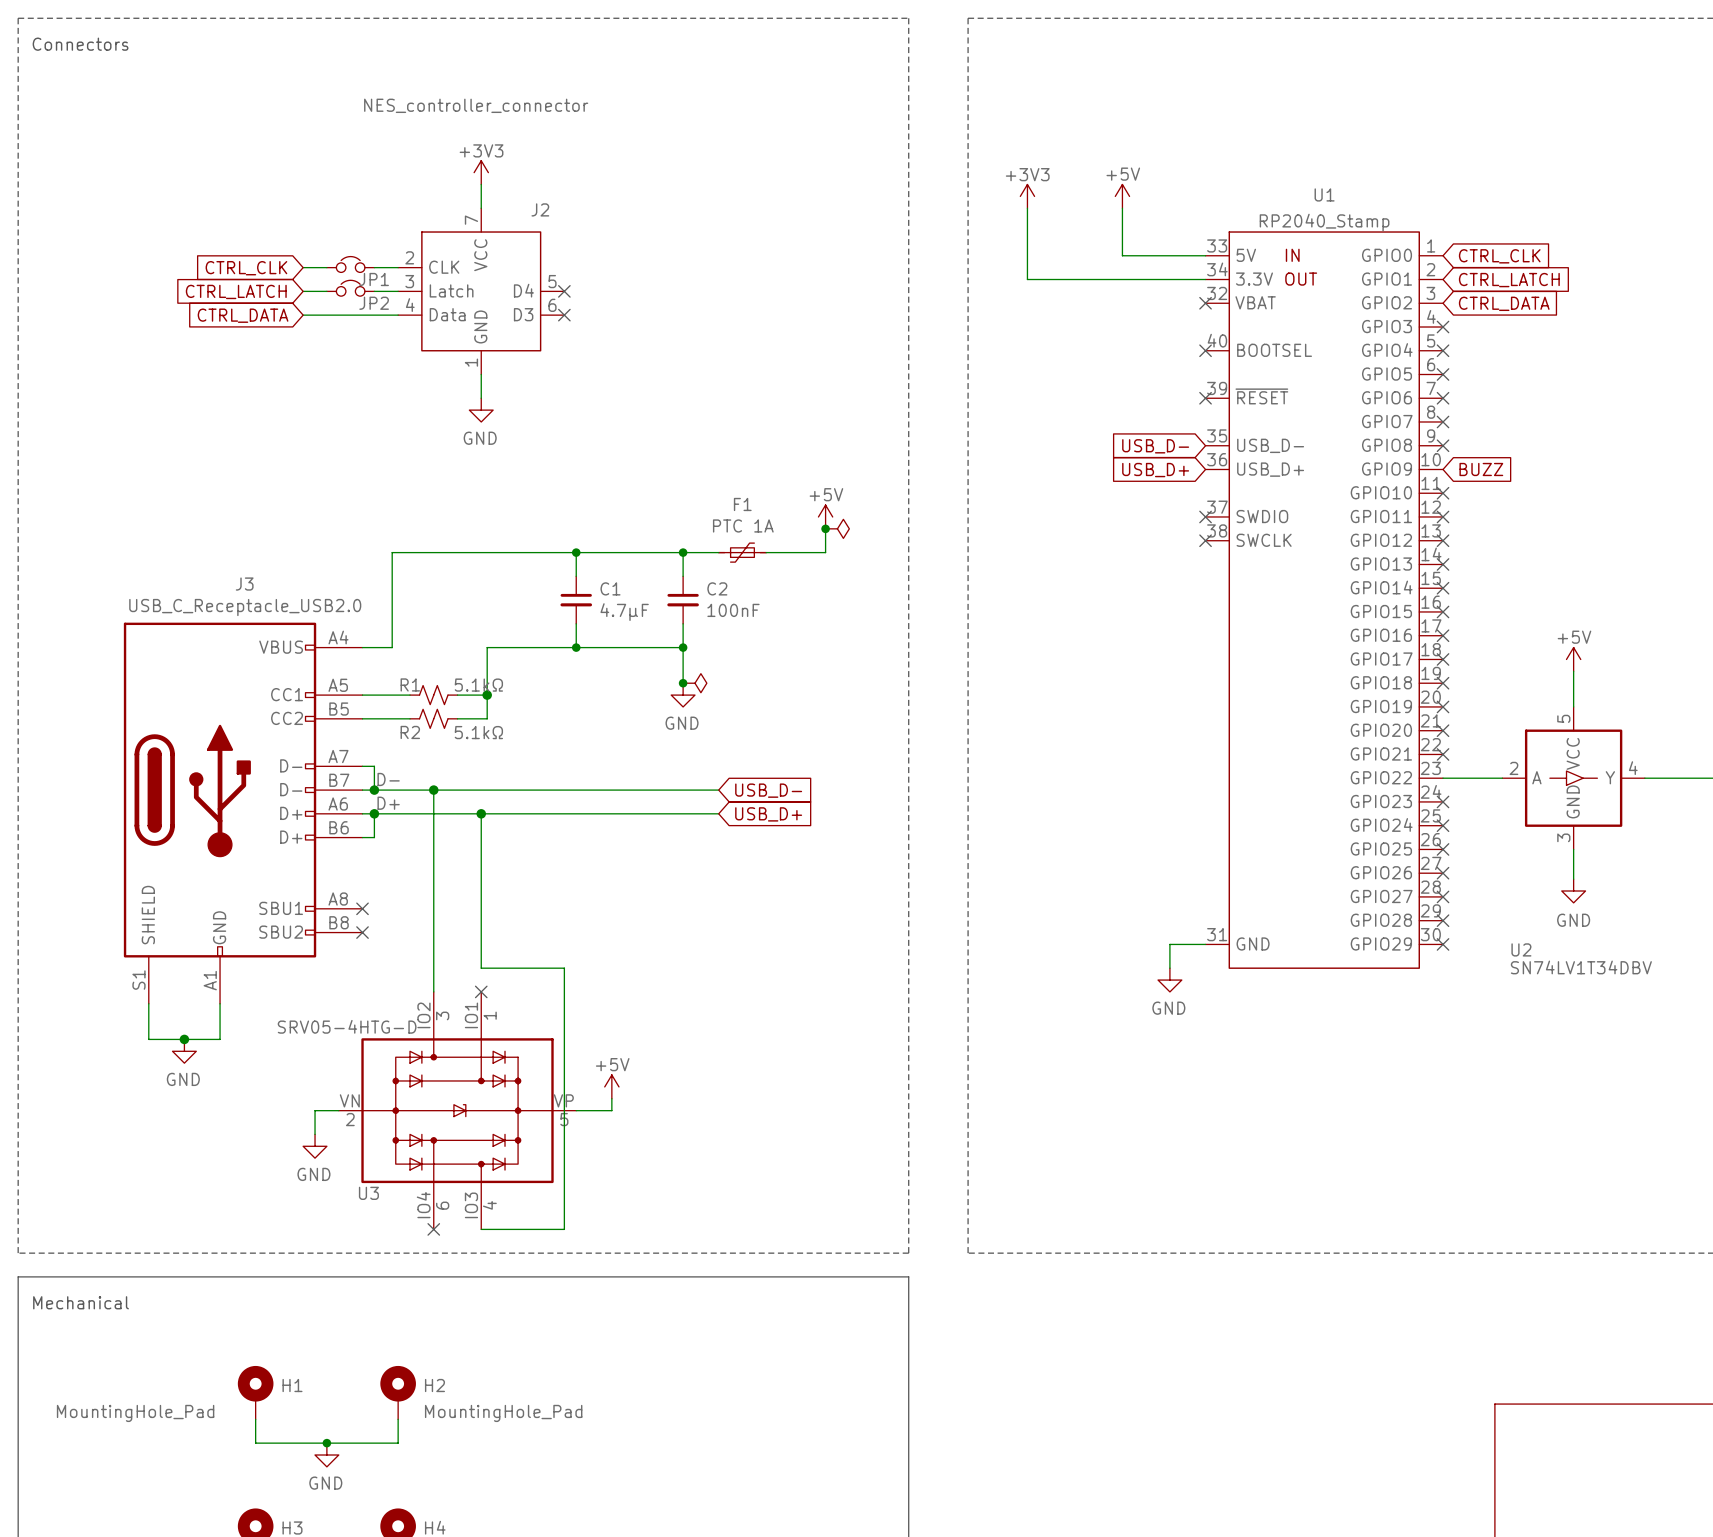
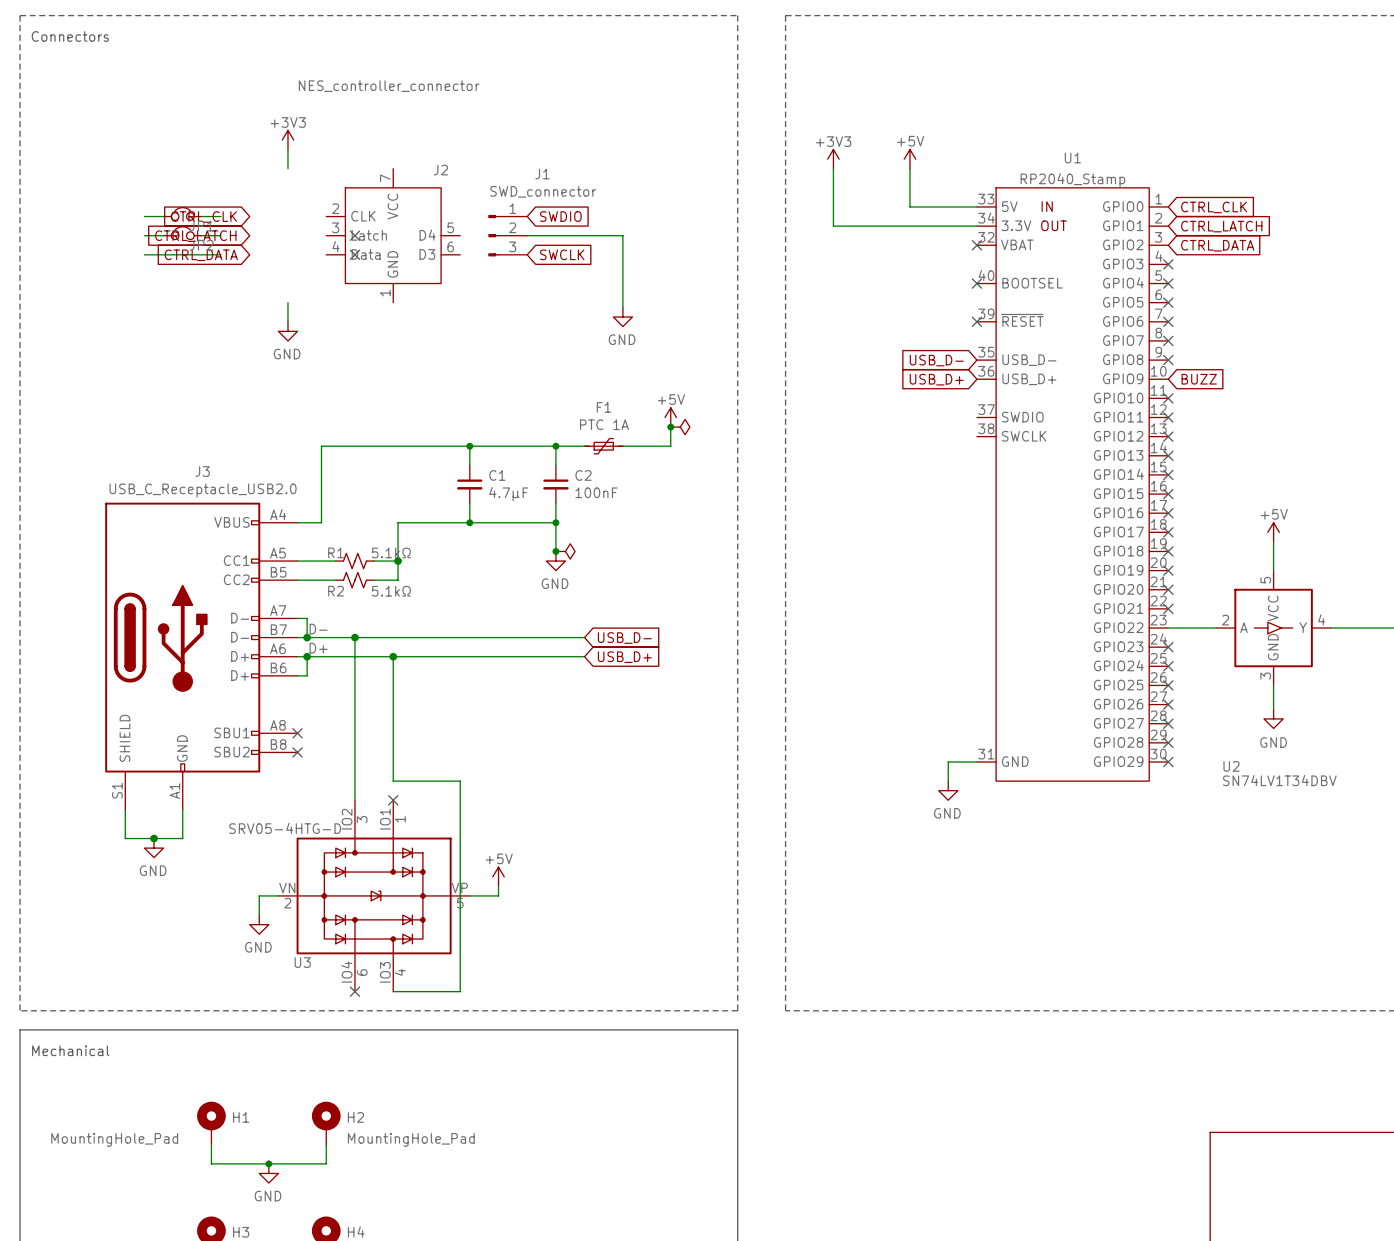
power symbol position: +3V3 (481, 172) -> +3V3 (287, 139)
wire: (481, 184) (481, 208) -> (287, 149) (287, 168)
JP1 position: (350, 264) -> (182, 214)
wire: (303, 267) (326, 267) -> (144, 216) (163, 216)
wire: (374, 267) (398, 267) -> (201, 216) (221, 216)
global label: none -> SWDIO (560, 216)
JP2 position: (350, 288) -> (182, 233)
wire: (303, 291) (326, 291) -> (144, 235) (163, 235)
wire: (374, 291) (398, 291) -> (201, 235) (221, 235)
no-connect mark: none -> (354, 235)
no-connect mark: (564, 291) -> none
J1: none -> SWD_connector (507, 235)
wire: none -> (527, 235) (622, 235) (622, 307)
wire: (303, 315) (398, 315) -> (144, 254) (221, 254)
no-connect mark: none -> (354, 254)
no-connect mark: (564, 315) -> none
global label: none -> SWCLK (562, 254)
wire: (481, 374) (481, 398) -> (287, 302) (287, 321)
power symbol: none -> GND (622, 317)
power symbol position: GND (481, 410) -> GND (287, 331)
no-connect mark: (1205, 516) -> none
no-connect mark: (1205, 540) -> none

